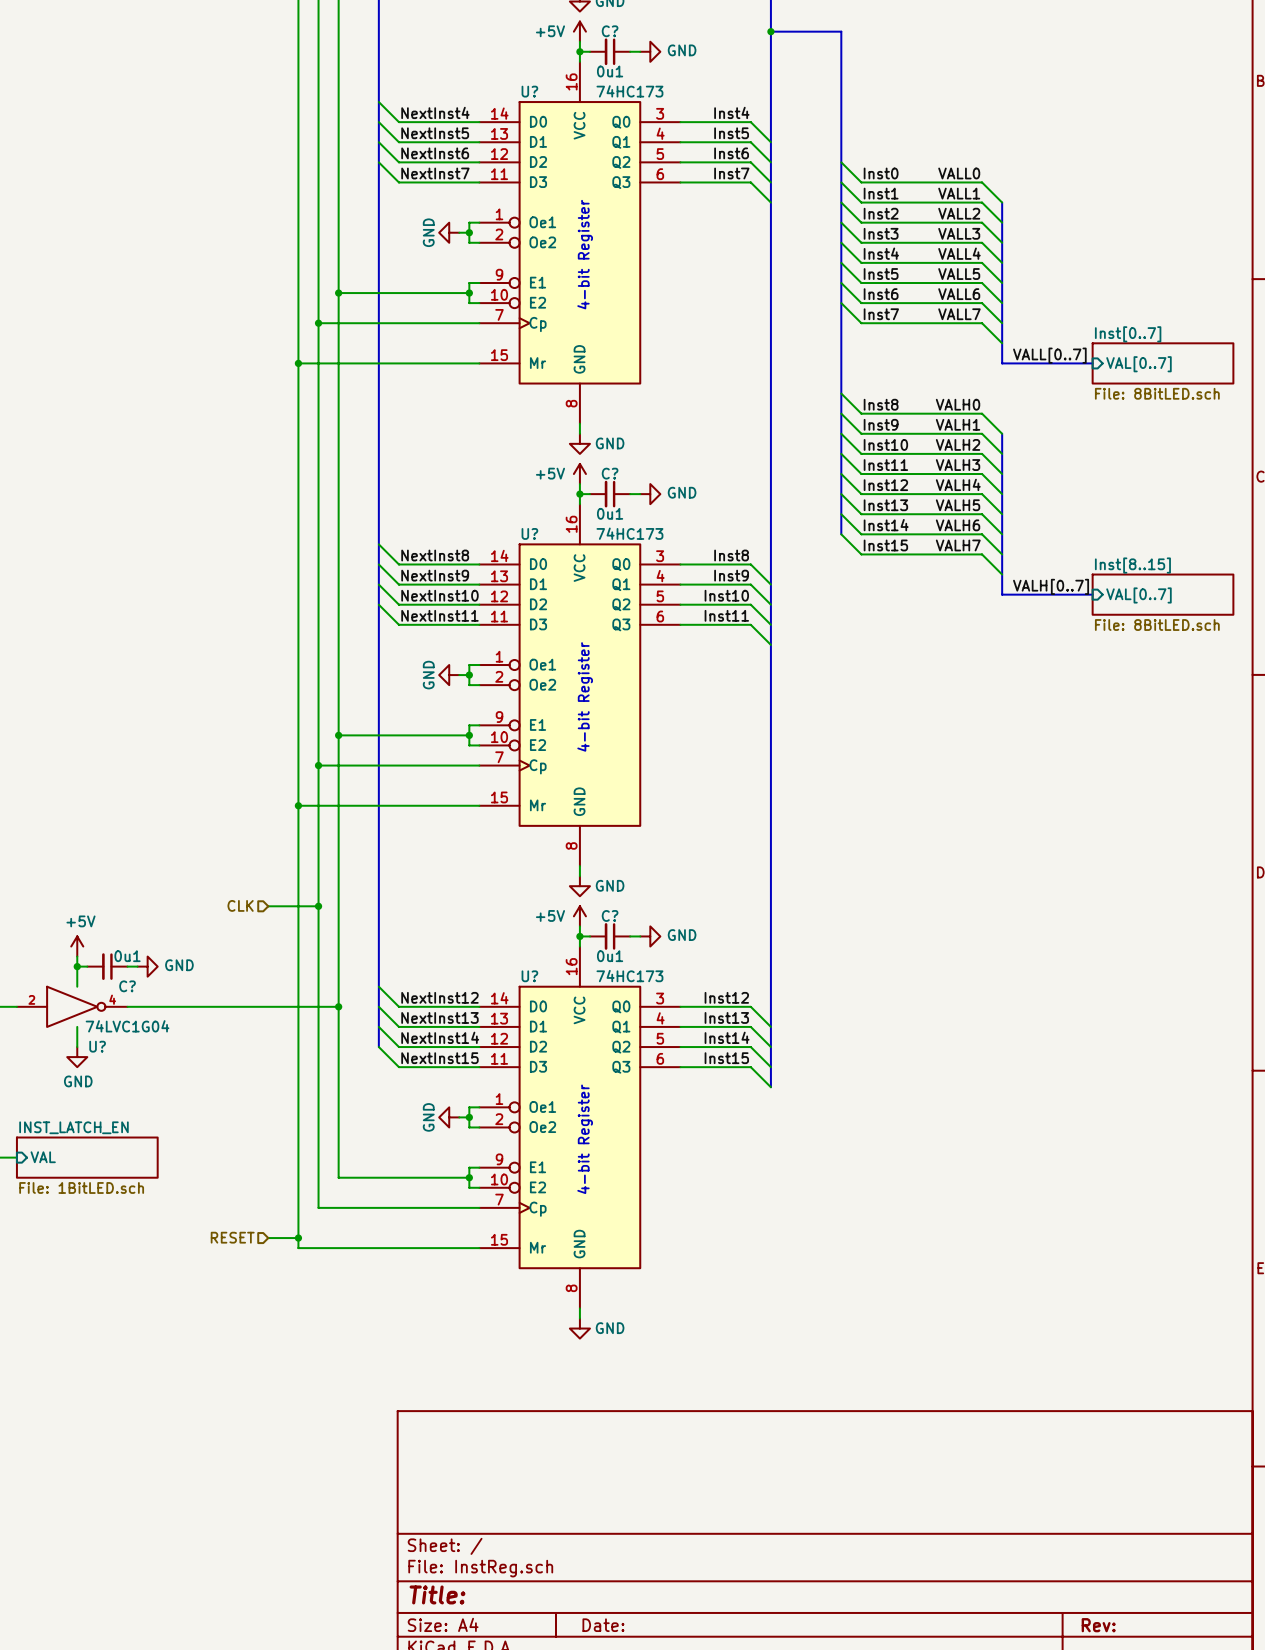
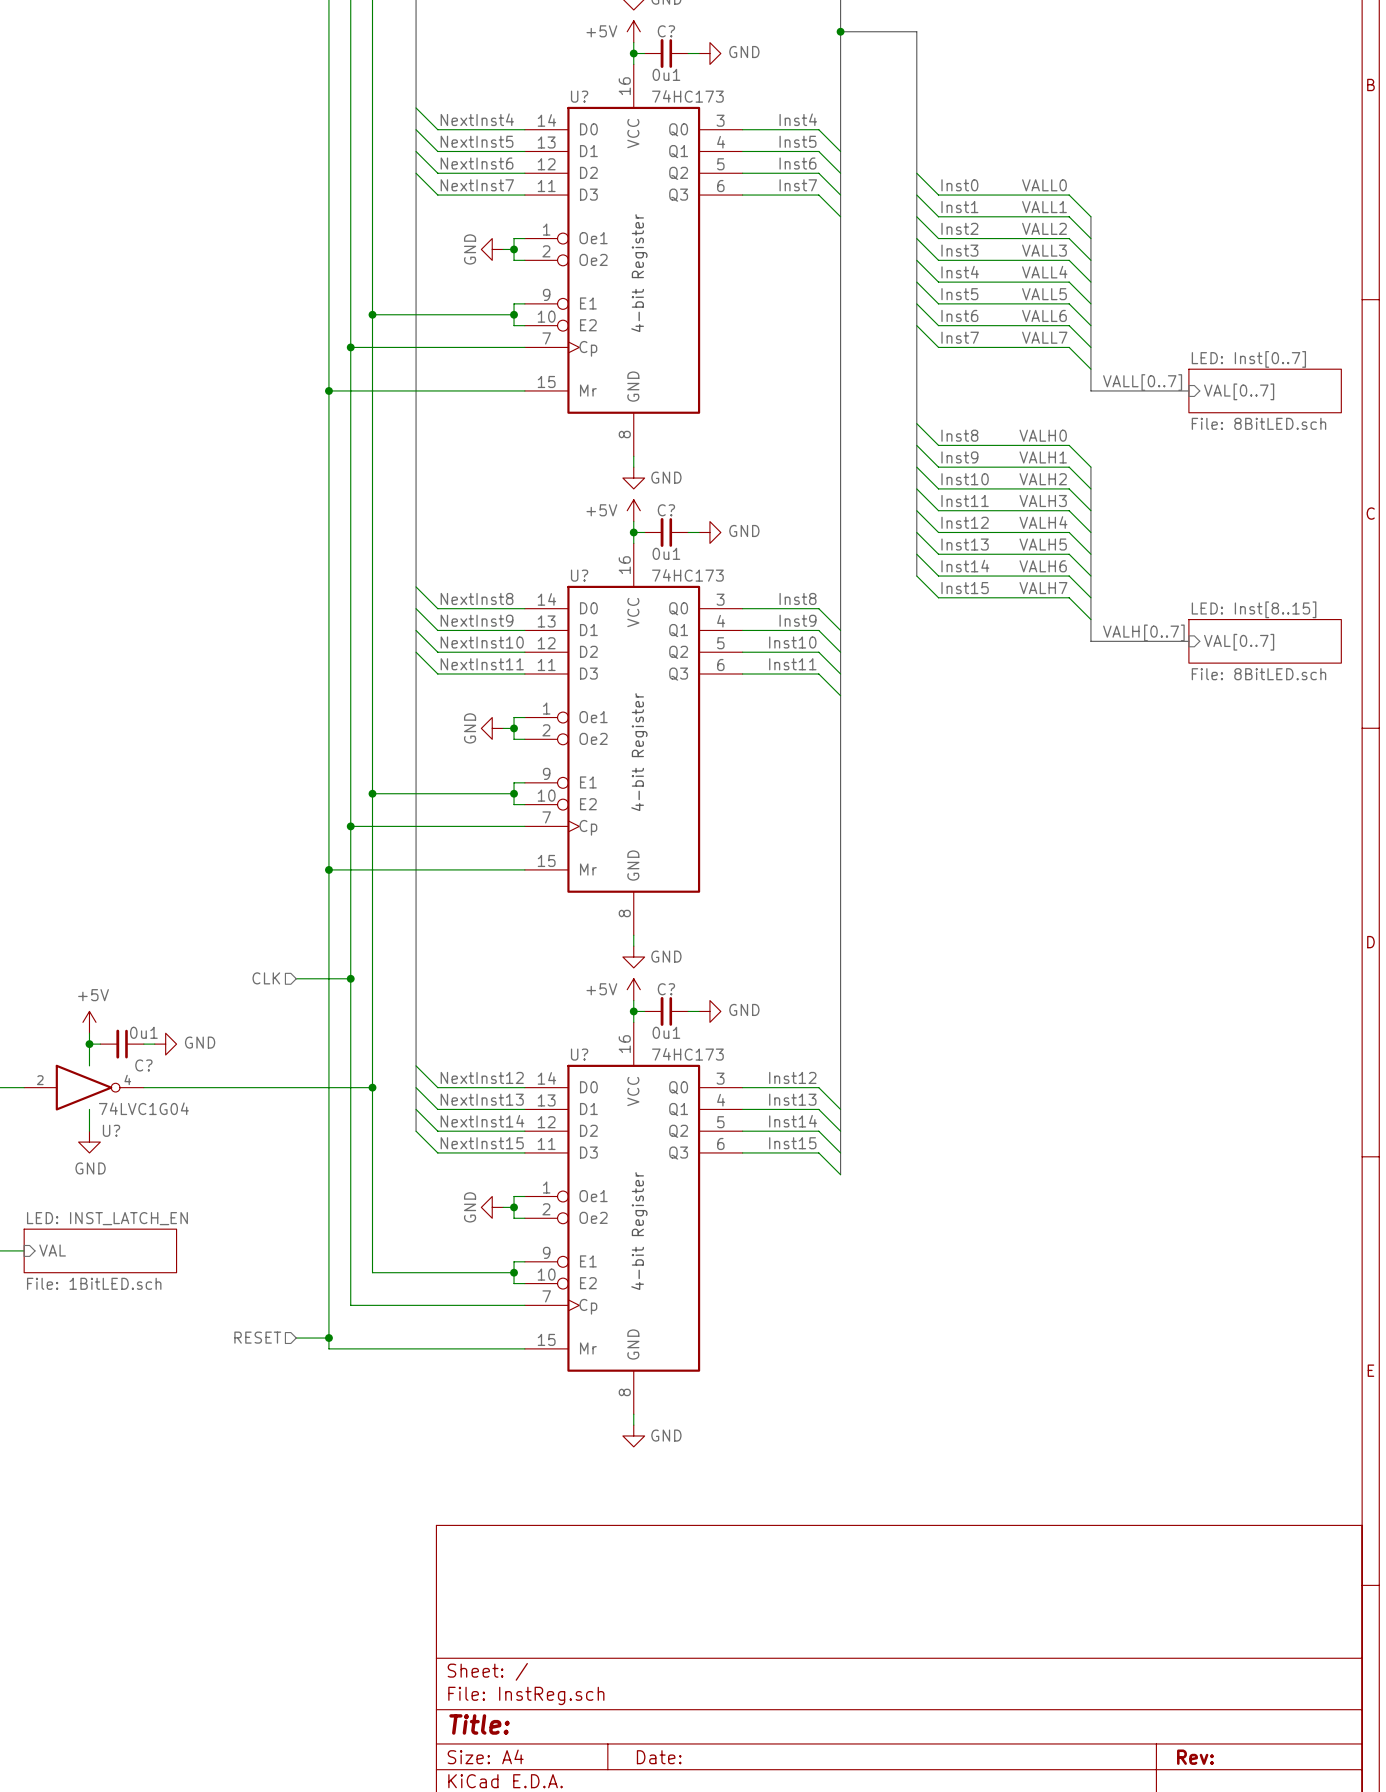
sheet Inst[0..7] name: Inst[0..7] (1128, 334) -> LED: Inst[0..7] (1248, 359)
sheet Inst[8..15] name: Inst[8..15] (1132, 565) -> LED: Inst[8..15] (1254, 609)
sheet INST_LATCH_EN name: INST_LATCH_EN (73, 1127) -> LED: INST_LATCH_EN (107, 1218)

